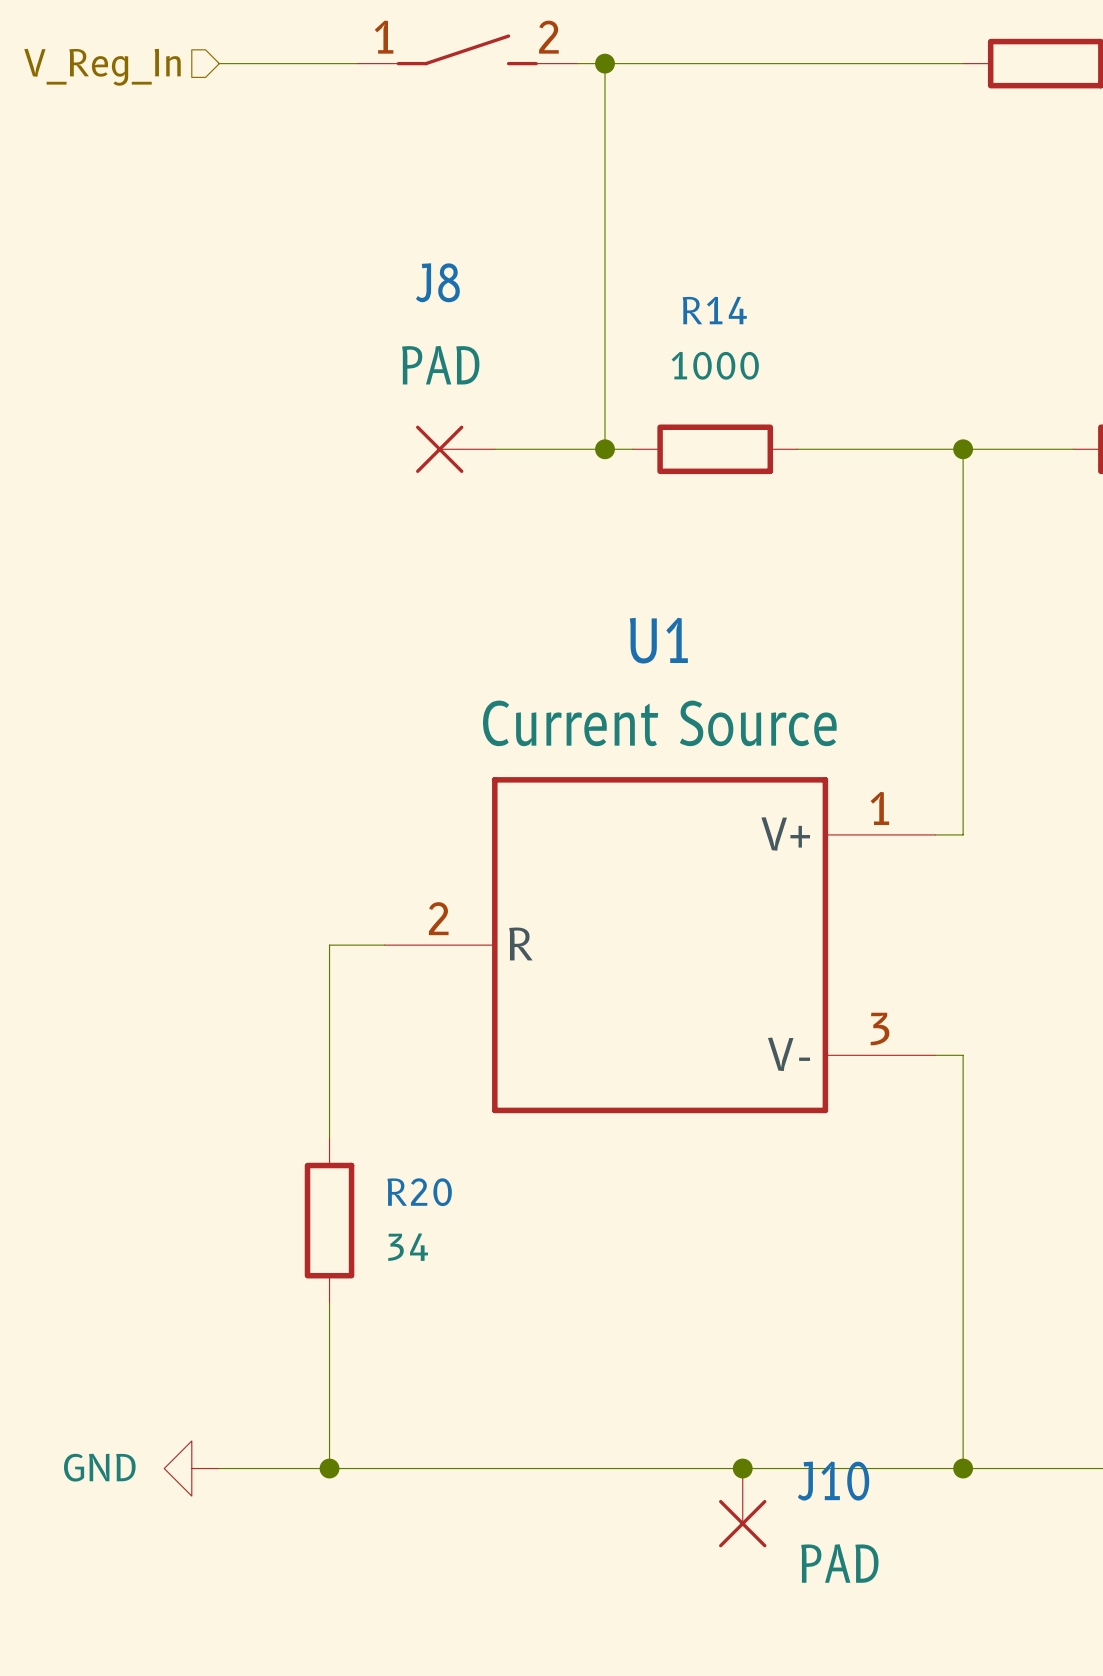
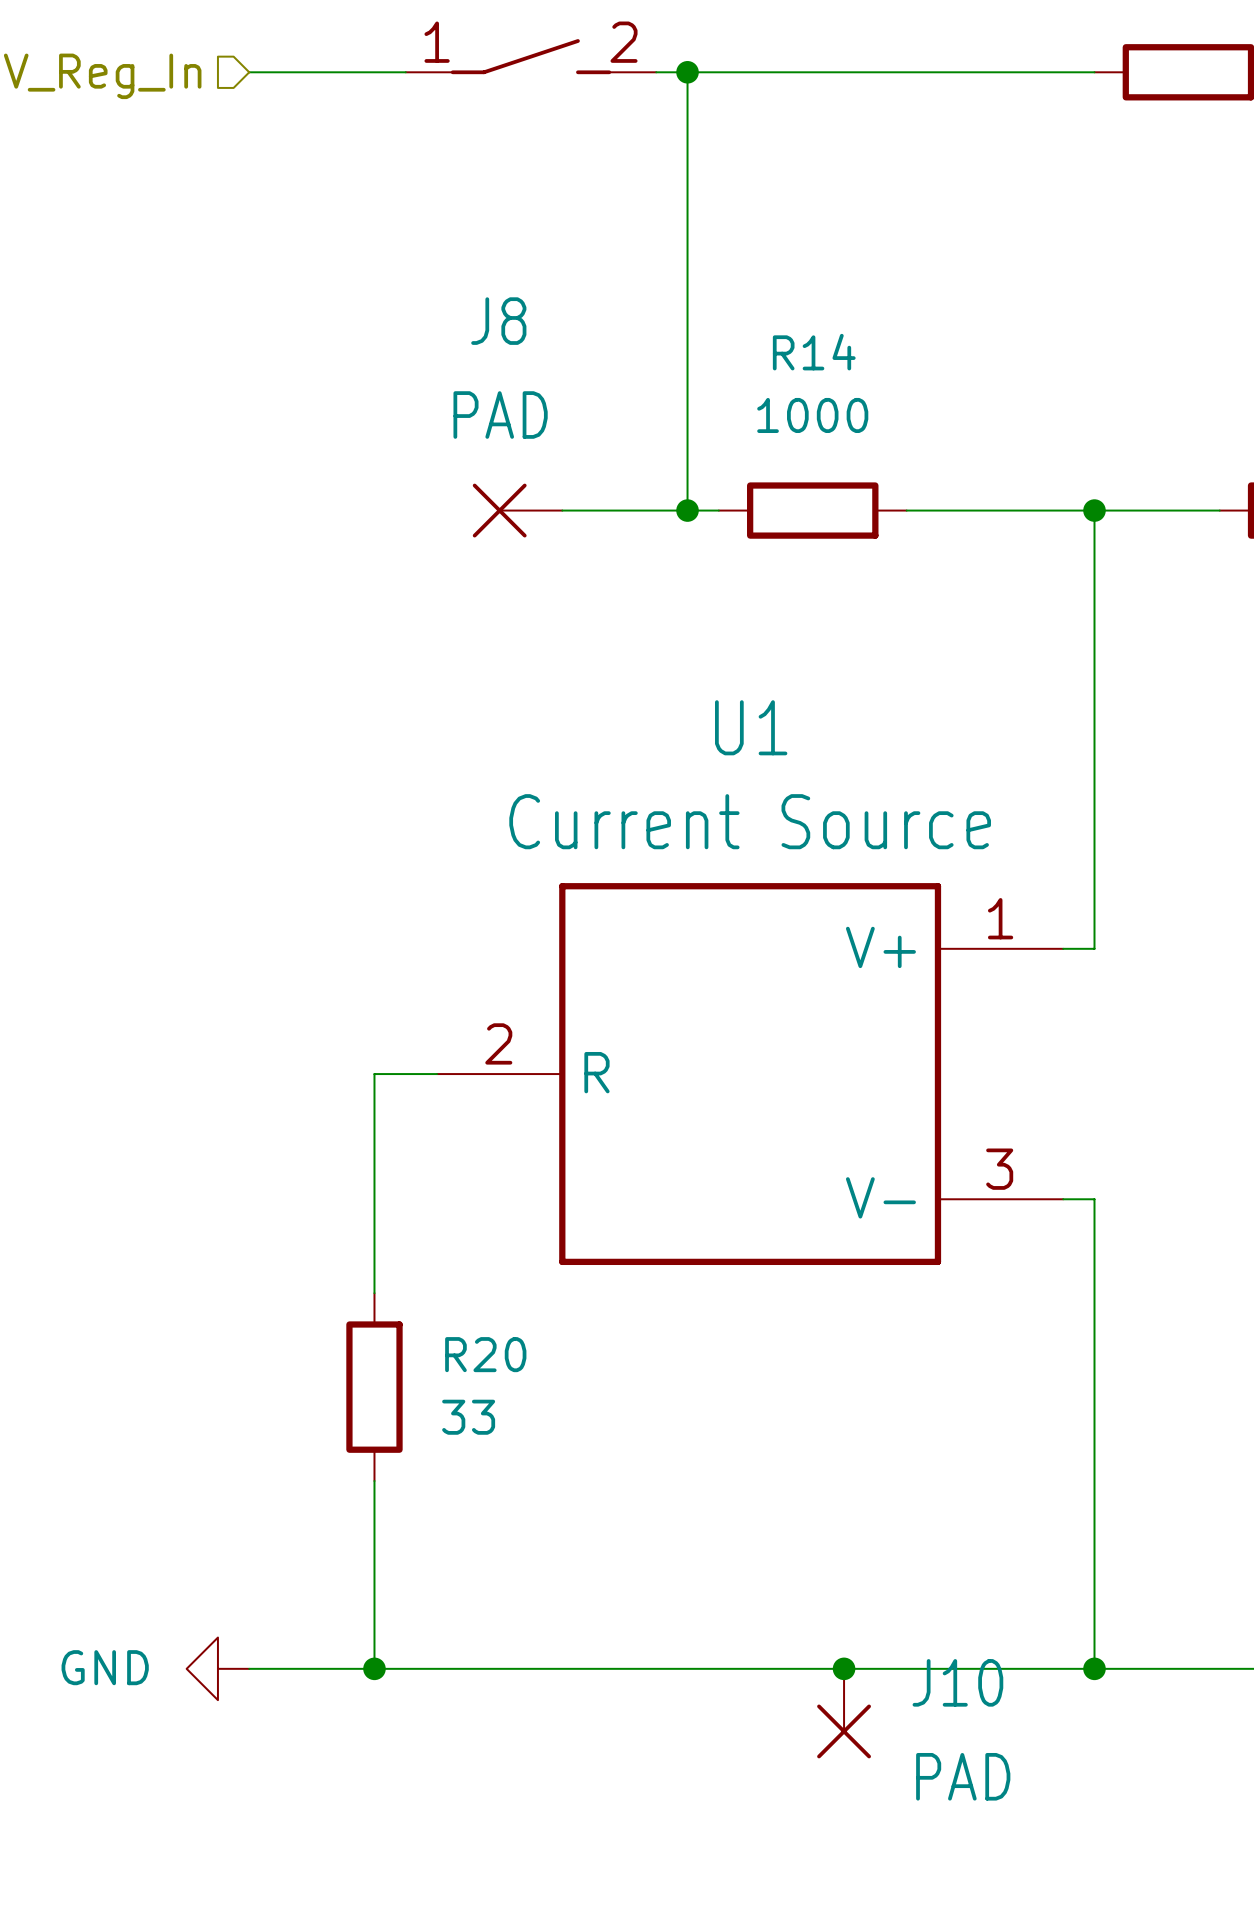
R20 value: 34 (408, 1247) -> 33 (468, 1417)

